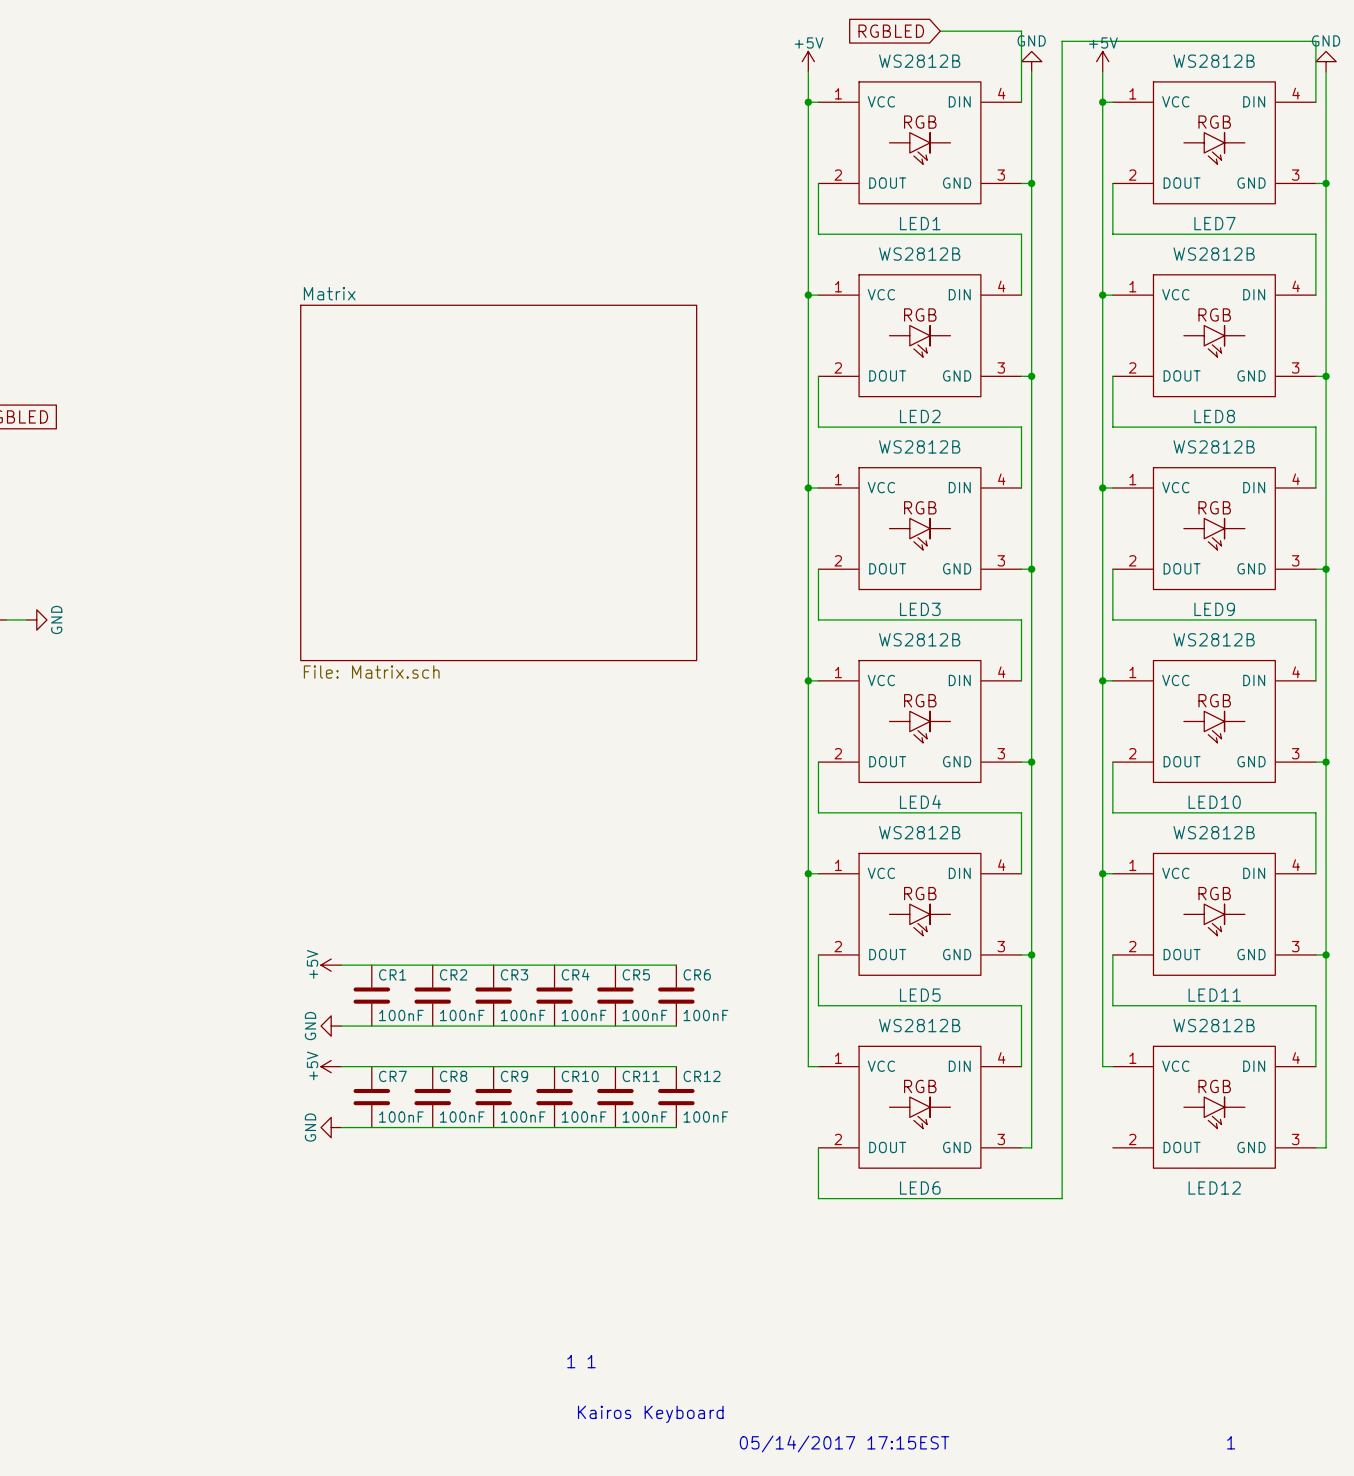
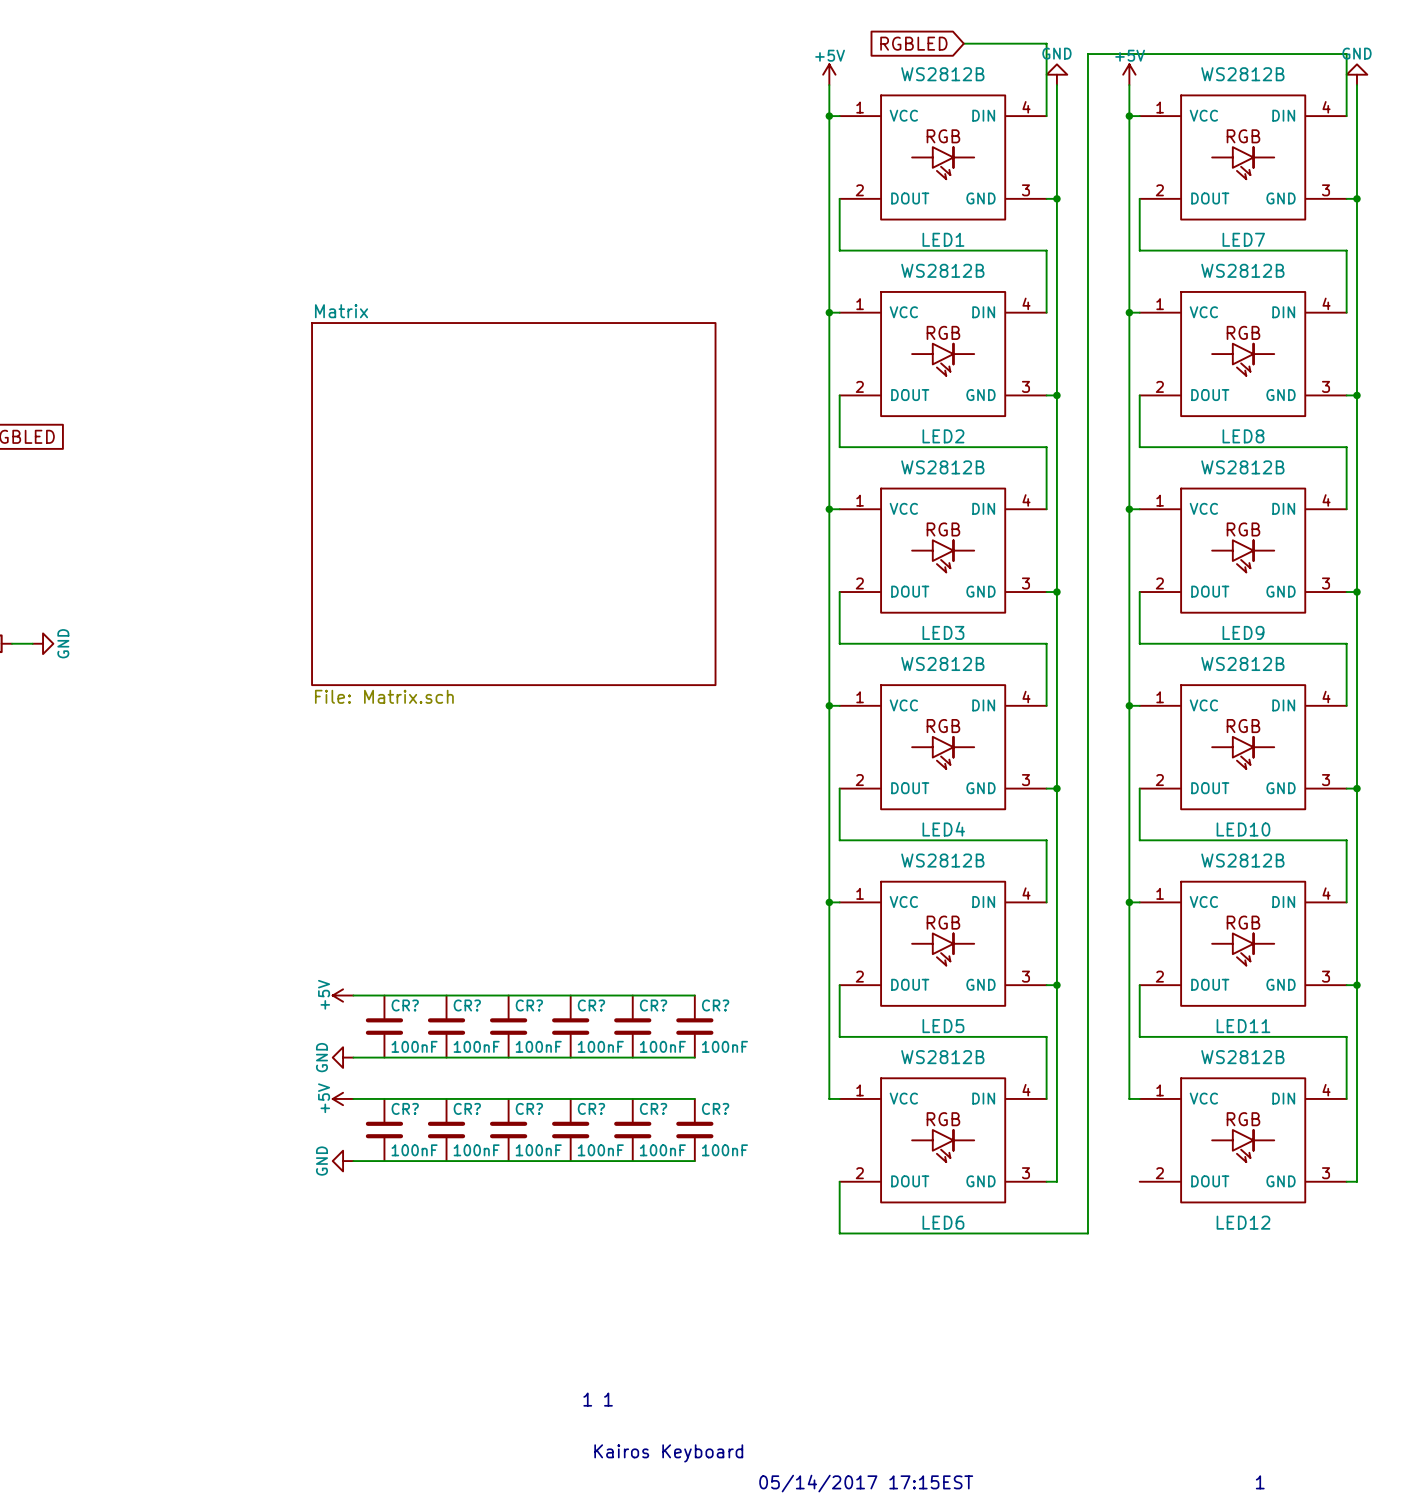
CR1 name: CR1 (392, 974) -> CR? (405, 1005)
CR2 name: CR2 (453, 974) -> CR? (467, 1005)
CR3 name: CR3 (514, 974) -> CR? (529, 1005)
CR4 name: CR4 (575, 974) -> CR? (591, 1005)
CR5 name: CR5 (636, 974) -> CR? (653, 1005)
CR6 name: CR6 (697, 974) -> CR? (715, 1005)
CR7 name: CR7 (392, 1076) -> CR? (405, 1108)
CR8 name: CR8 (453, 1076) -> CR? (467, 1108)
CR9 name: CR9 (514, 1076) -> CR? (529, 1108)
CR10 name: CR10 (580, 1076) -> CR? (591, 1108)
CR11 name: CR11 (641, 1076) -> CR? (653, 1108)
CR12 name: CR12 (702, 1076) -> CR? (715, 1108)

